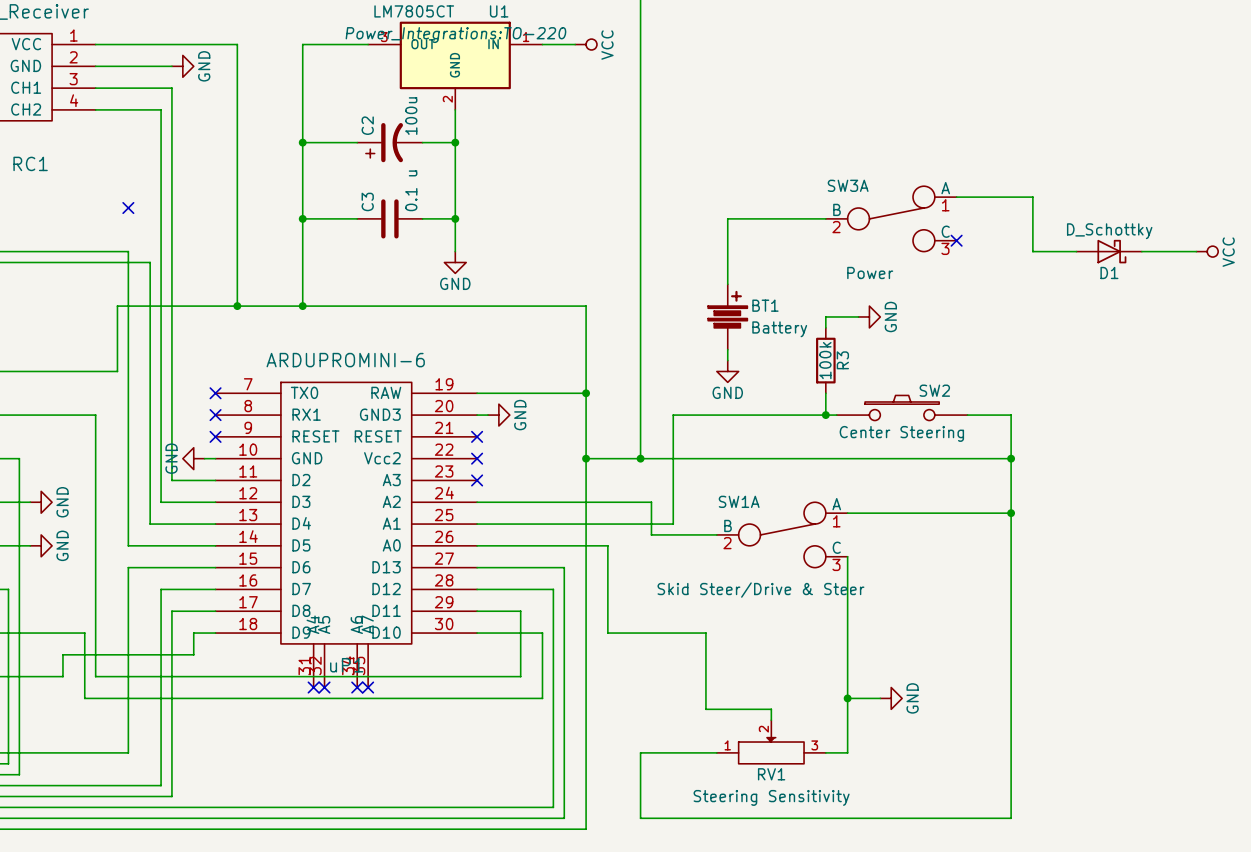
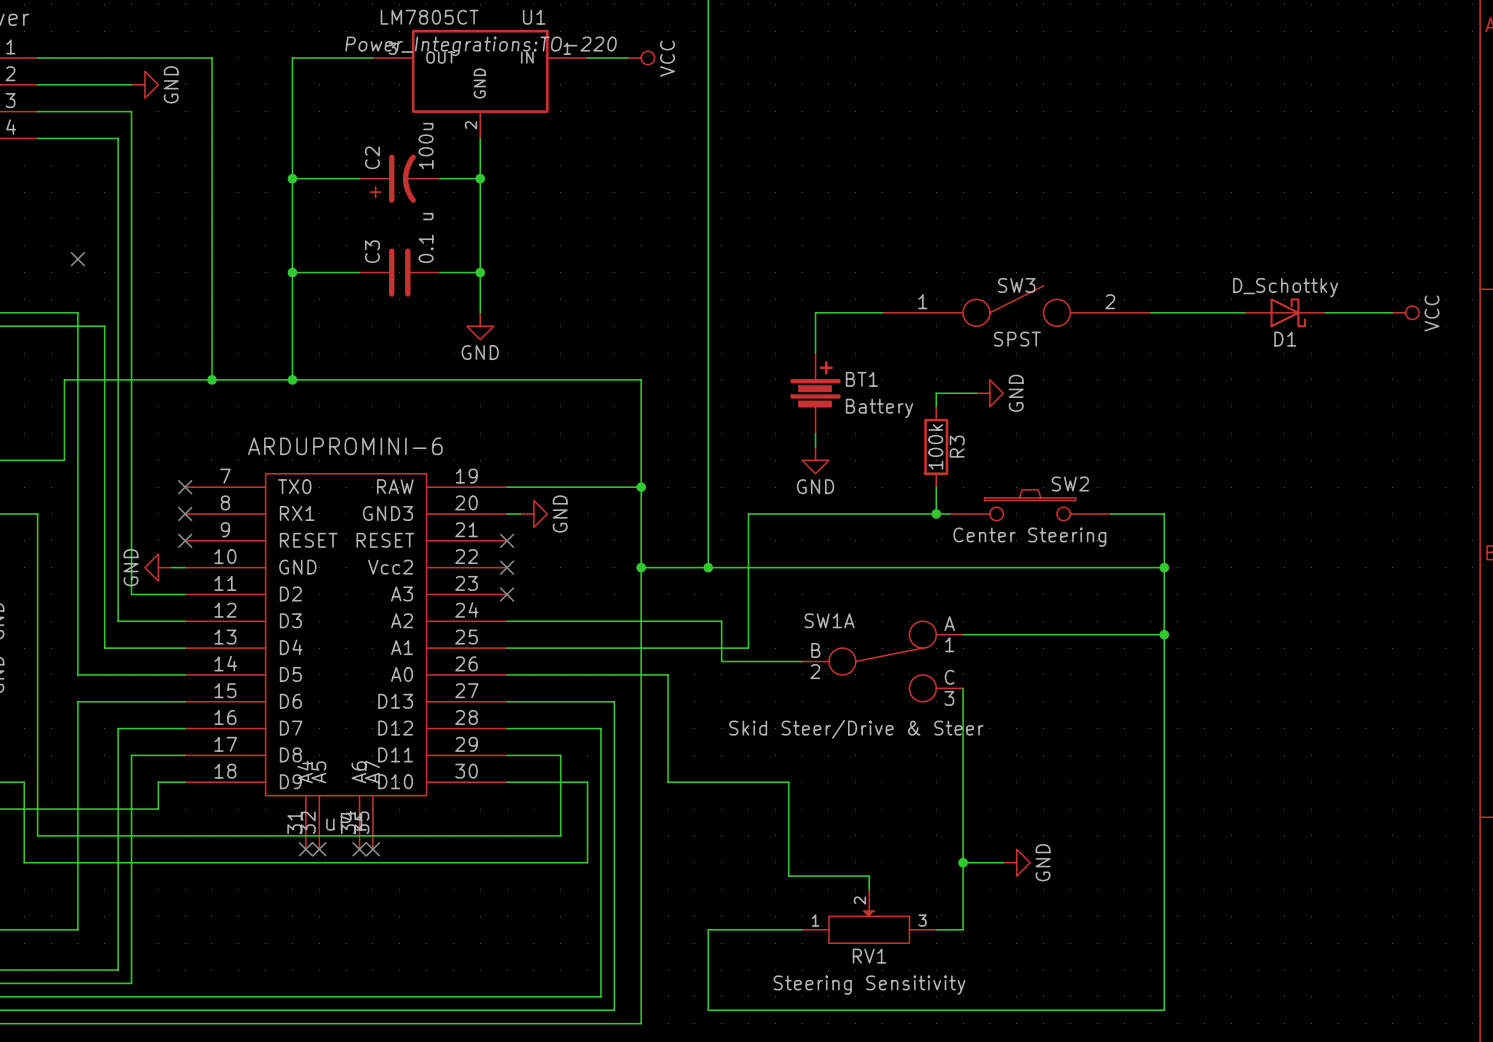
wire: (956, 197) (1032, 197) (1032, 251) -> (1150, 312) (1191, 312)
wire: (825, 218) (727, 218) (727, 251) -> (882, 312) (815, 312)
SW3A: Power (891, 218) -> none
no-connect mark: (956, 240) -> none
SW3: none -> SPST (1016, 306)

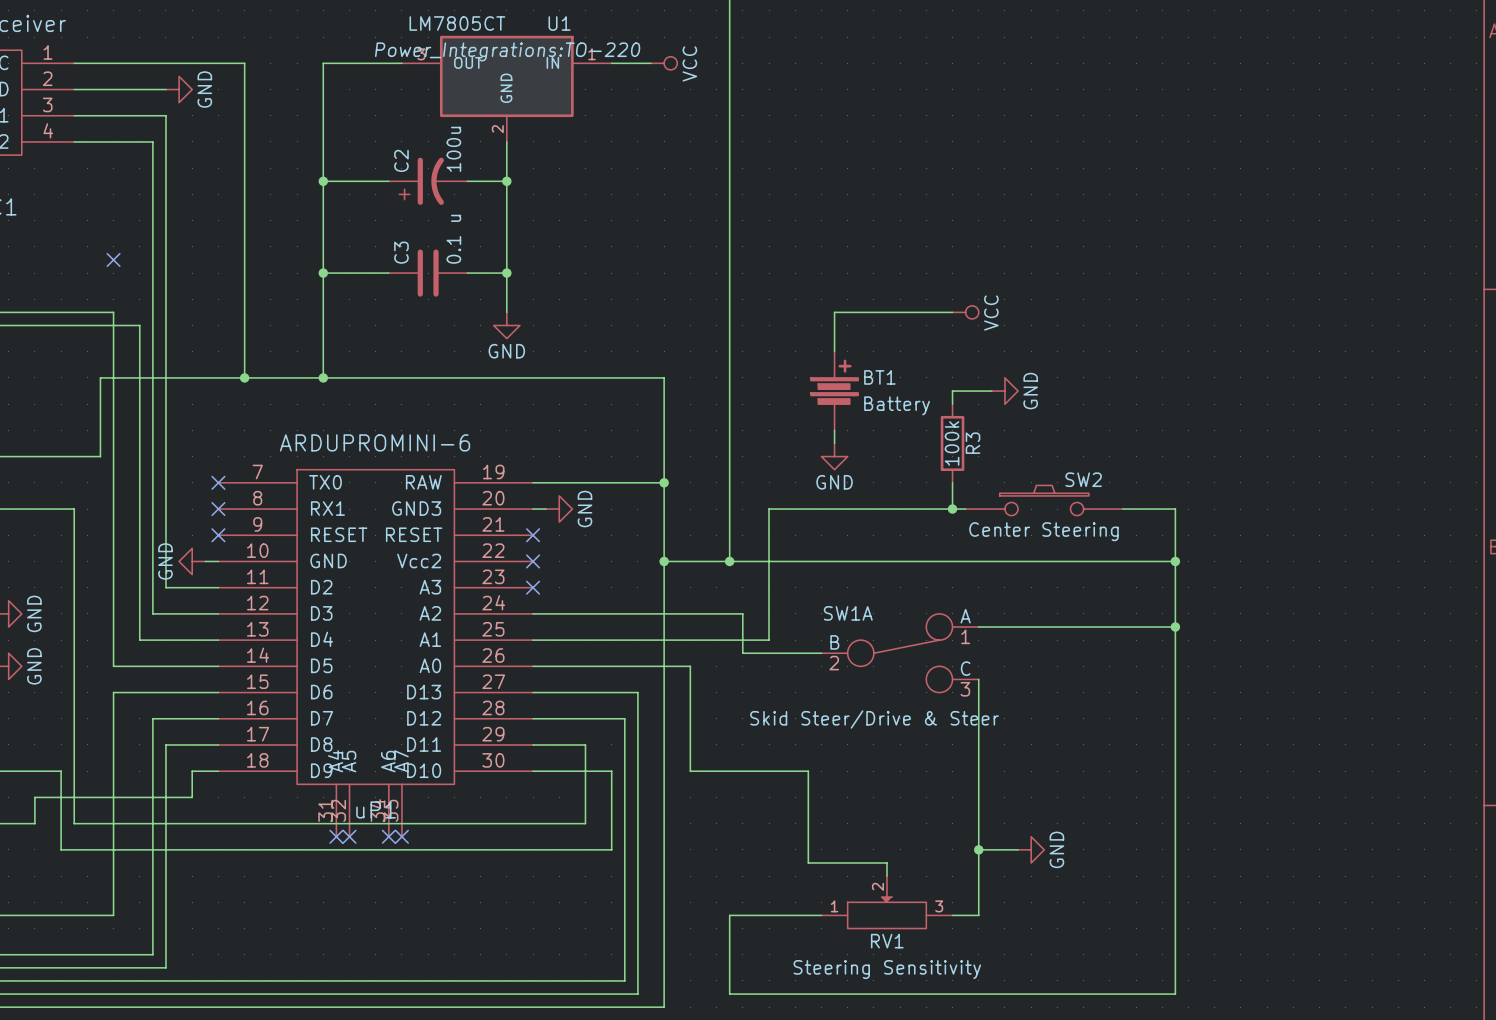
SW3: SPST (1016, 306) -> none
power symbol: none -> VCC (965, 312)
wire: (1150, 312) (1244, 312) -> none
D1: D_Schottky (1284, 312) -> none
wire: (1325, 312) (1392, 312) -> none
power symbol: VCC (1405, 312) -> none

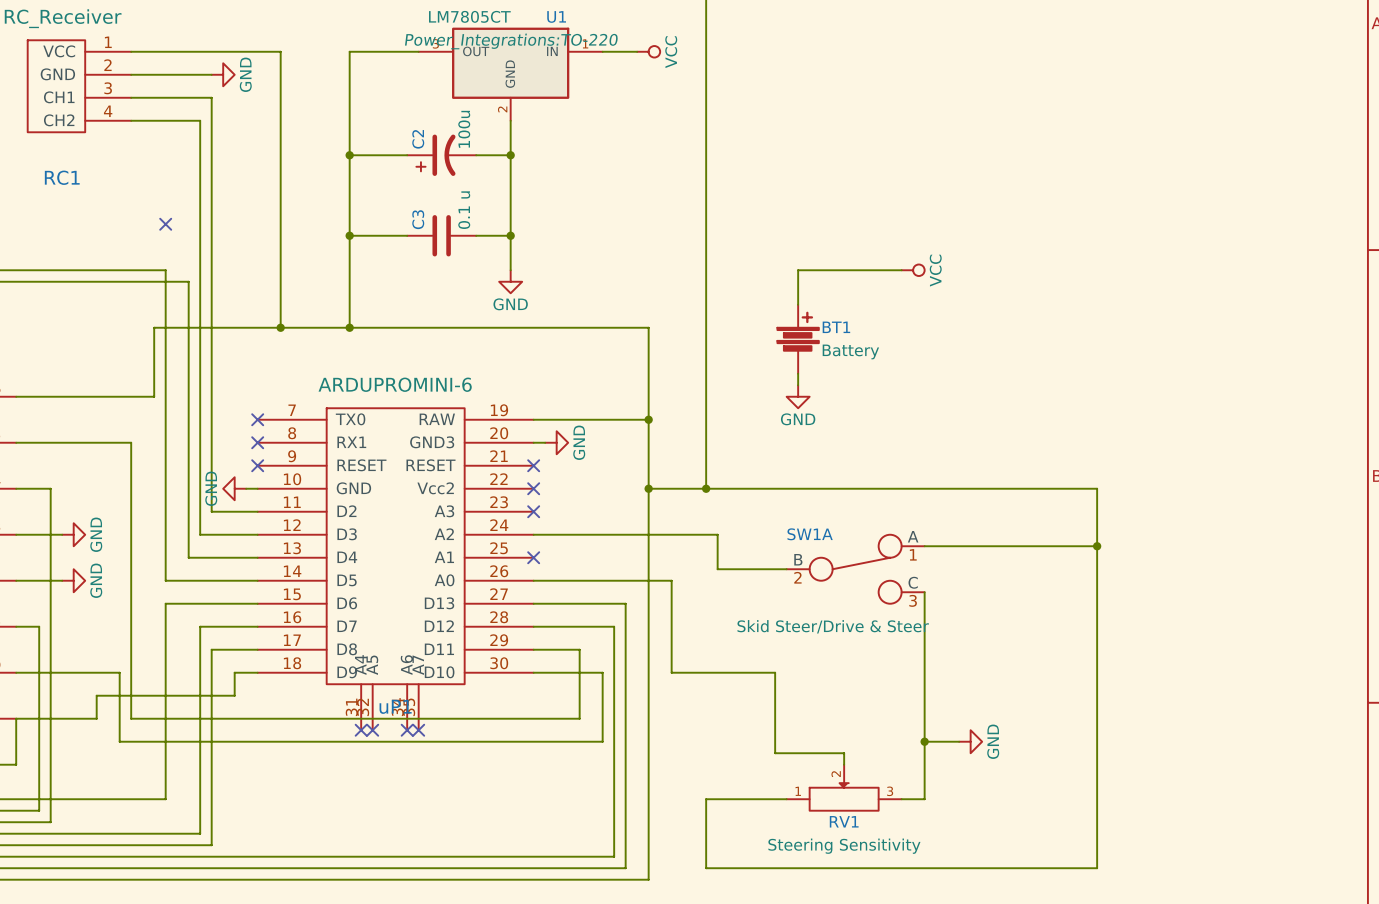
wire: (991, 391) (952, 391) (952, 404) -> none
power symbol: GND (1004, 391) -> none
R3: 100k (952, 443) -> none
wire: (952, 482) (952, 509) -> none
SW2: Center Steering (1044, 500) -> none
junction: (952, 509) -> none
wire: (965, 509) (769, 509) (769, 640) (533, 640) -> none
wire: (1122, 509) (1175, 509) (1175, 561) -> none
junction: (1175, 561) -> none
no-connect mark: none -> (533, 557)

